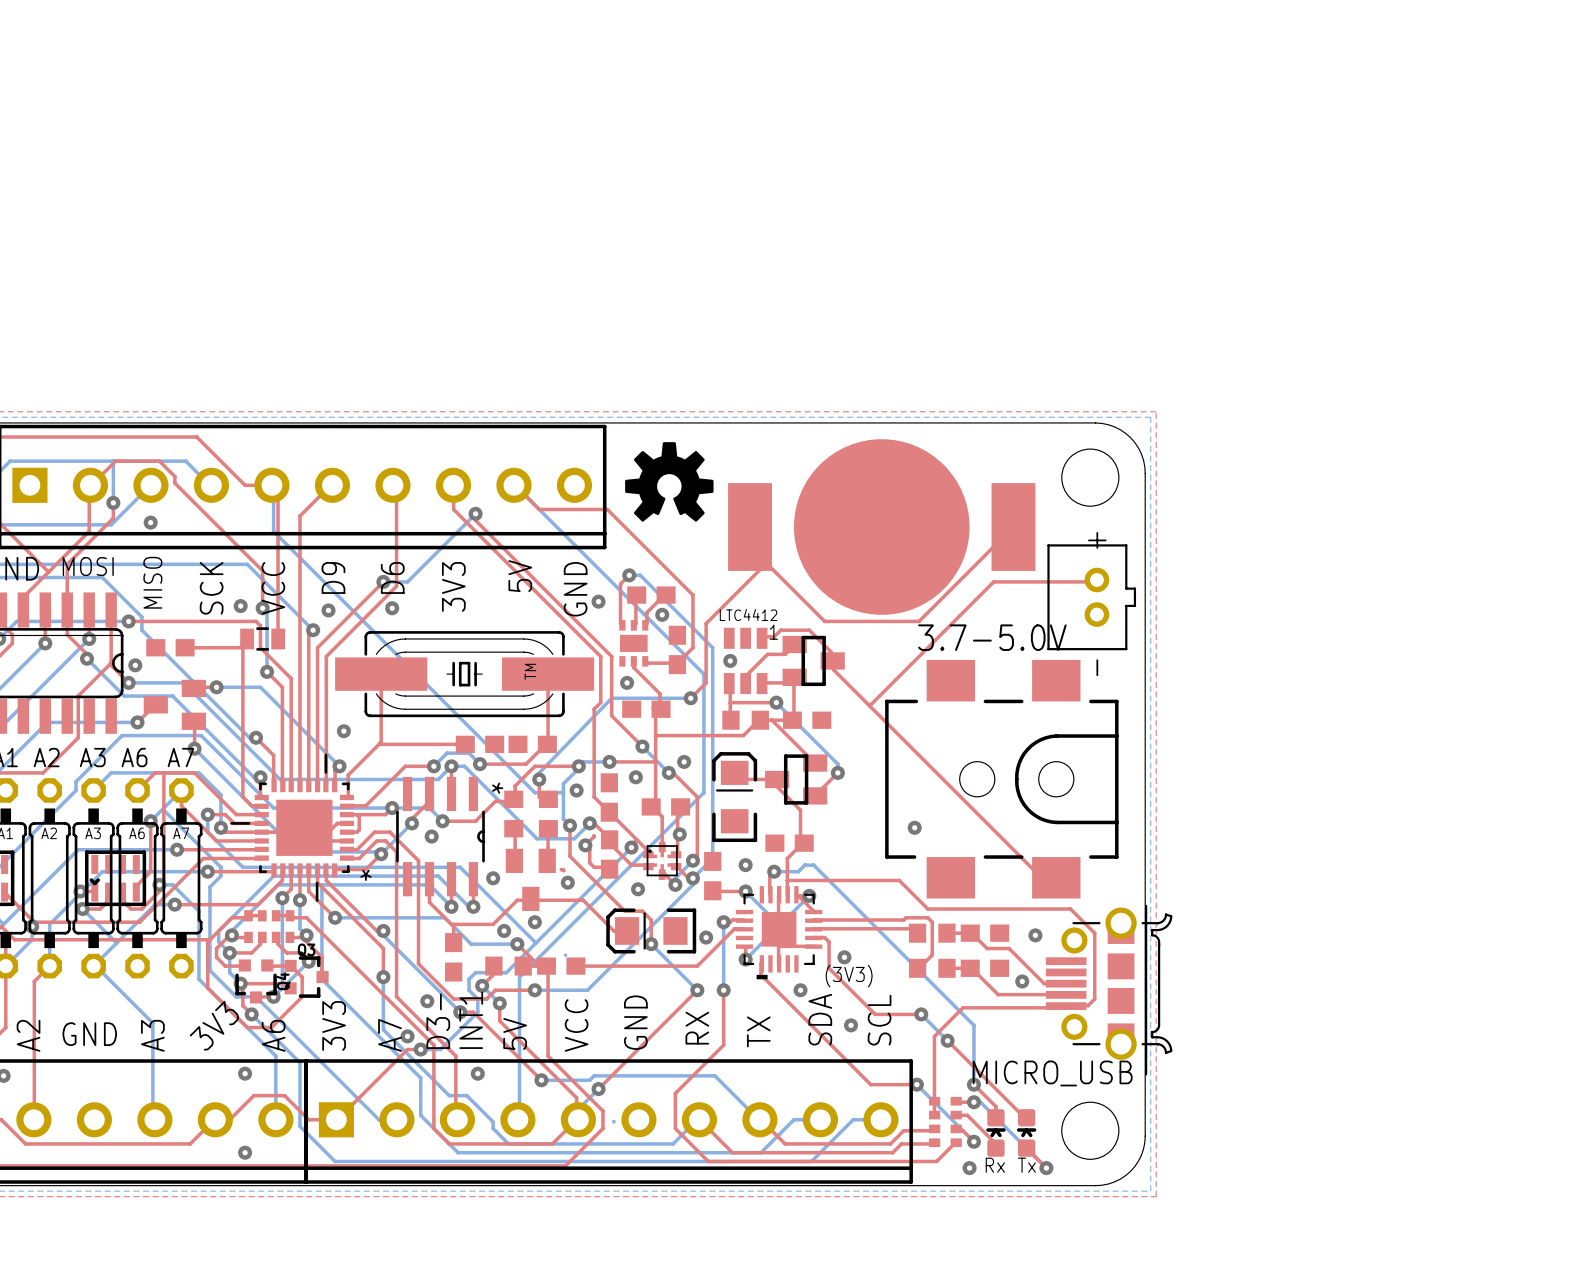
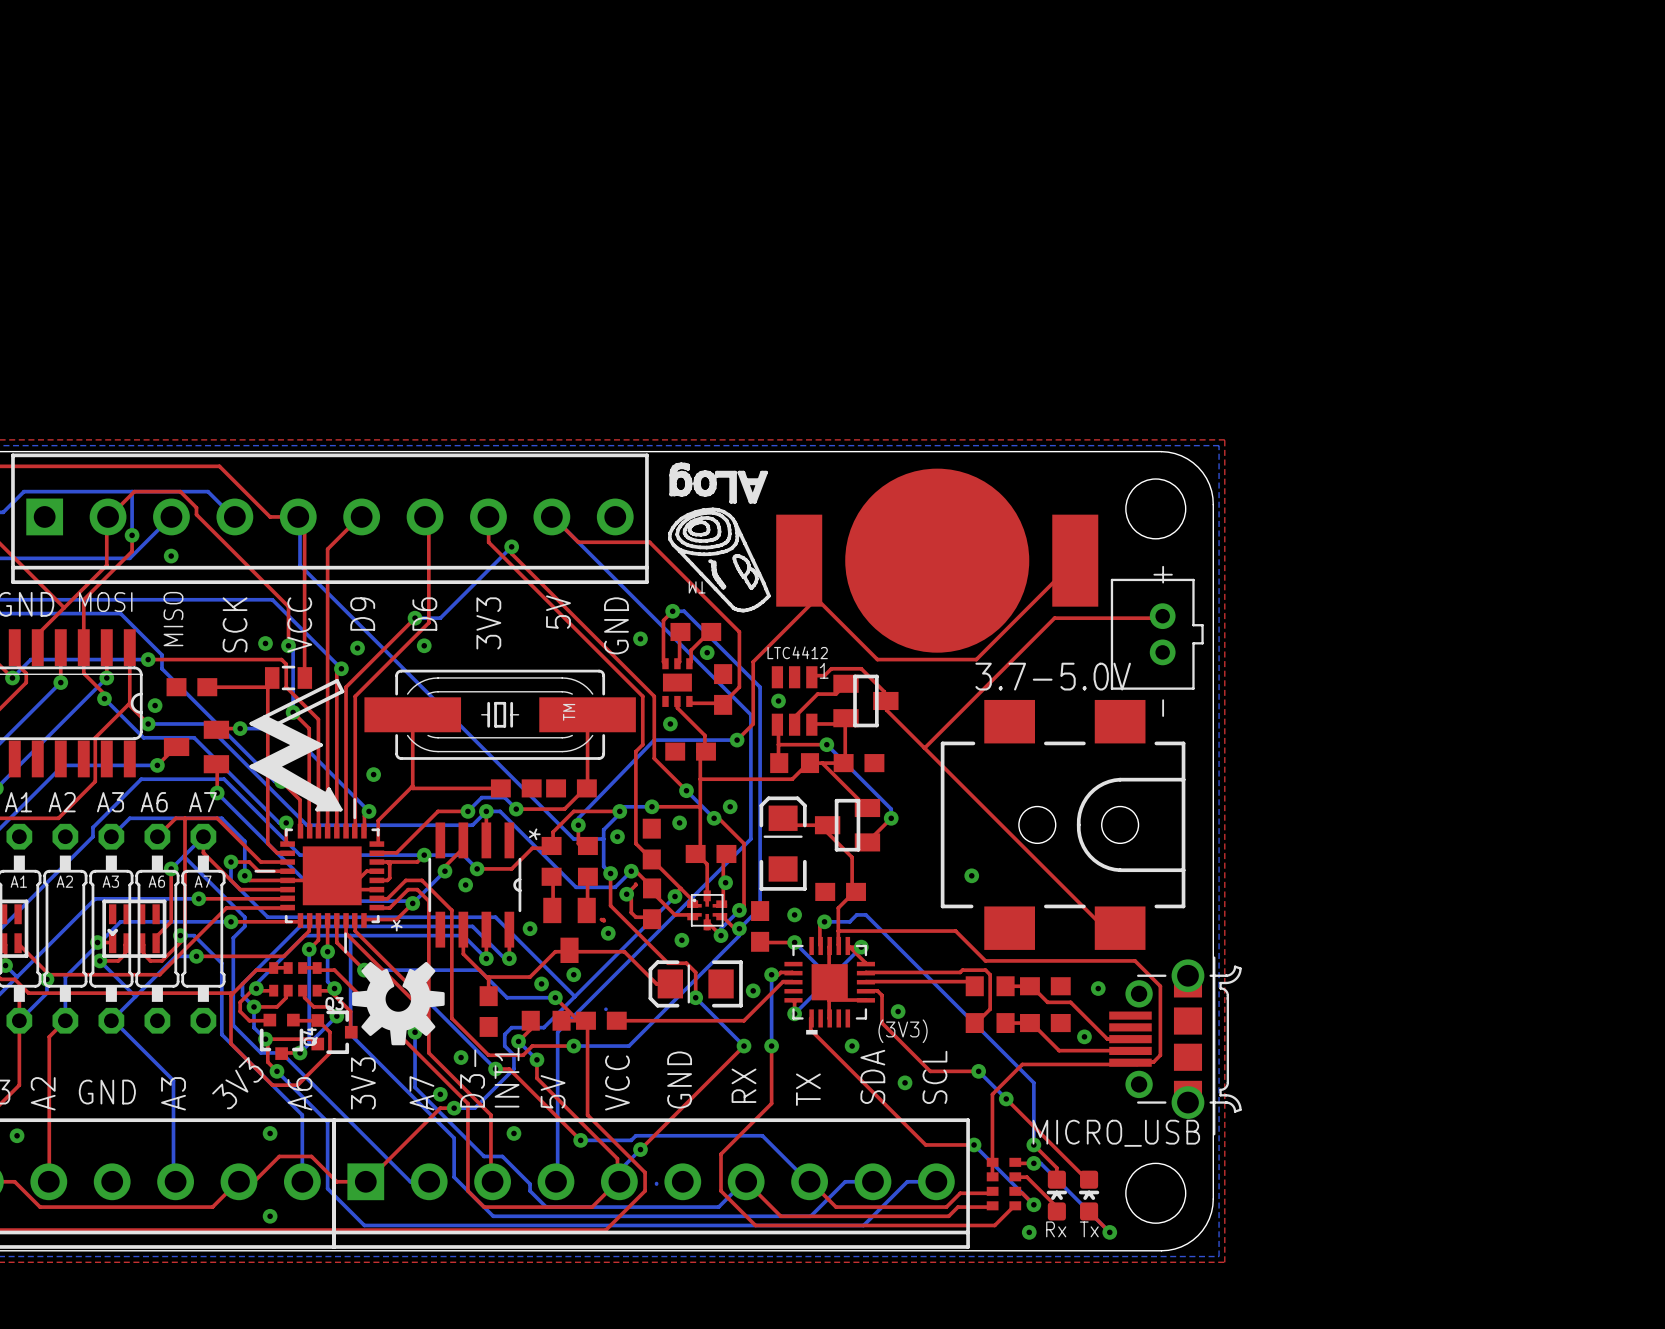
drawing: none -> [668, 462, 771, 613]
drawing: [625, 442, 714, 522] -> none
text: none -> TM (697, 587)
drawing: none -> [249, 678, 345, 812]
drawing: none -> [352, 961, 445, 1046]

